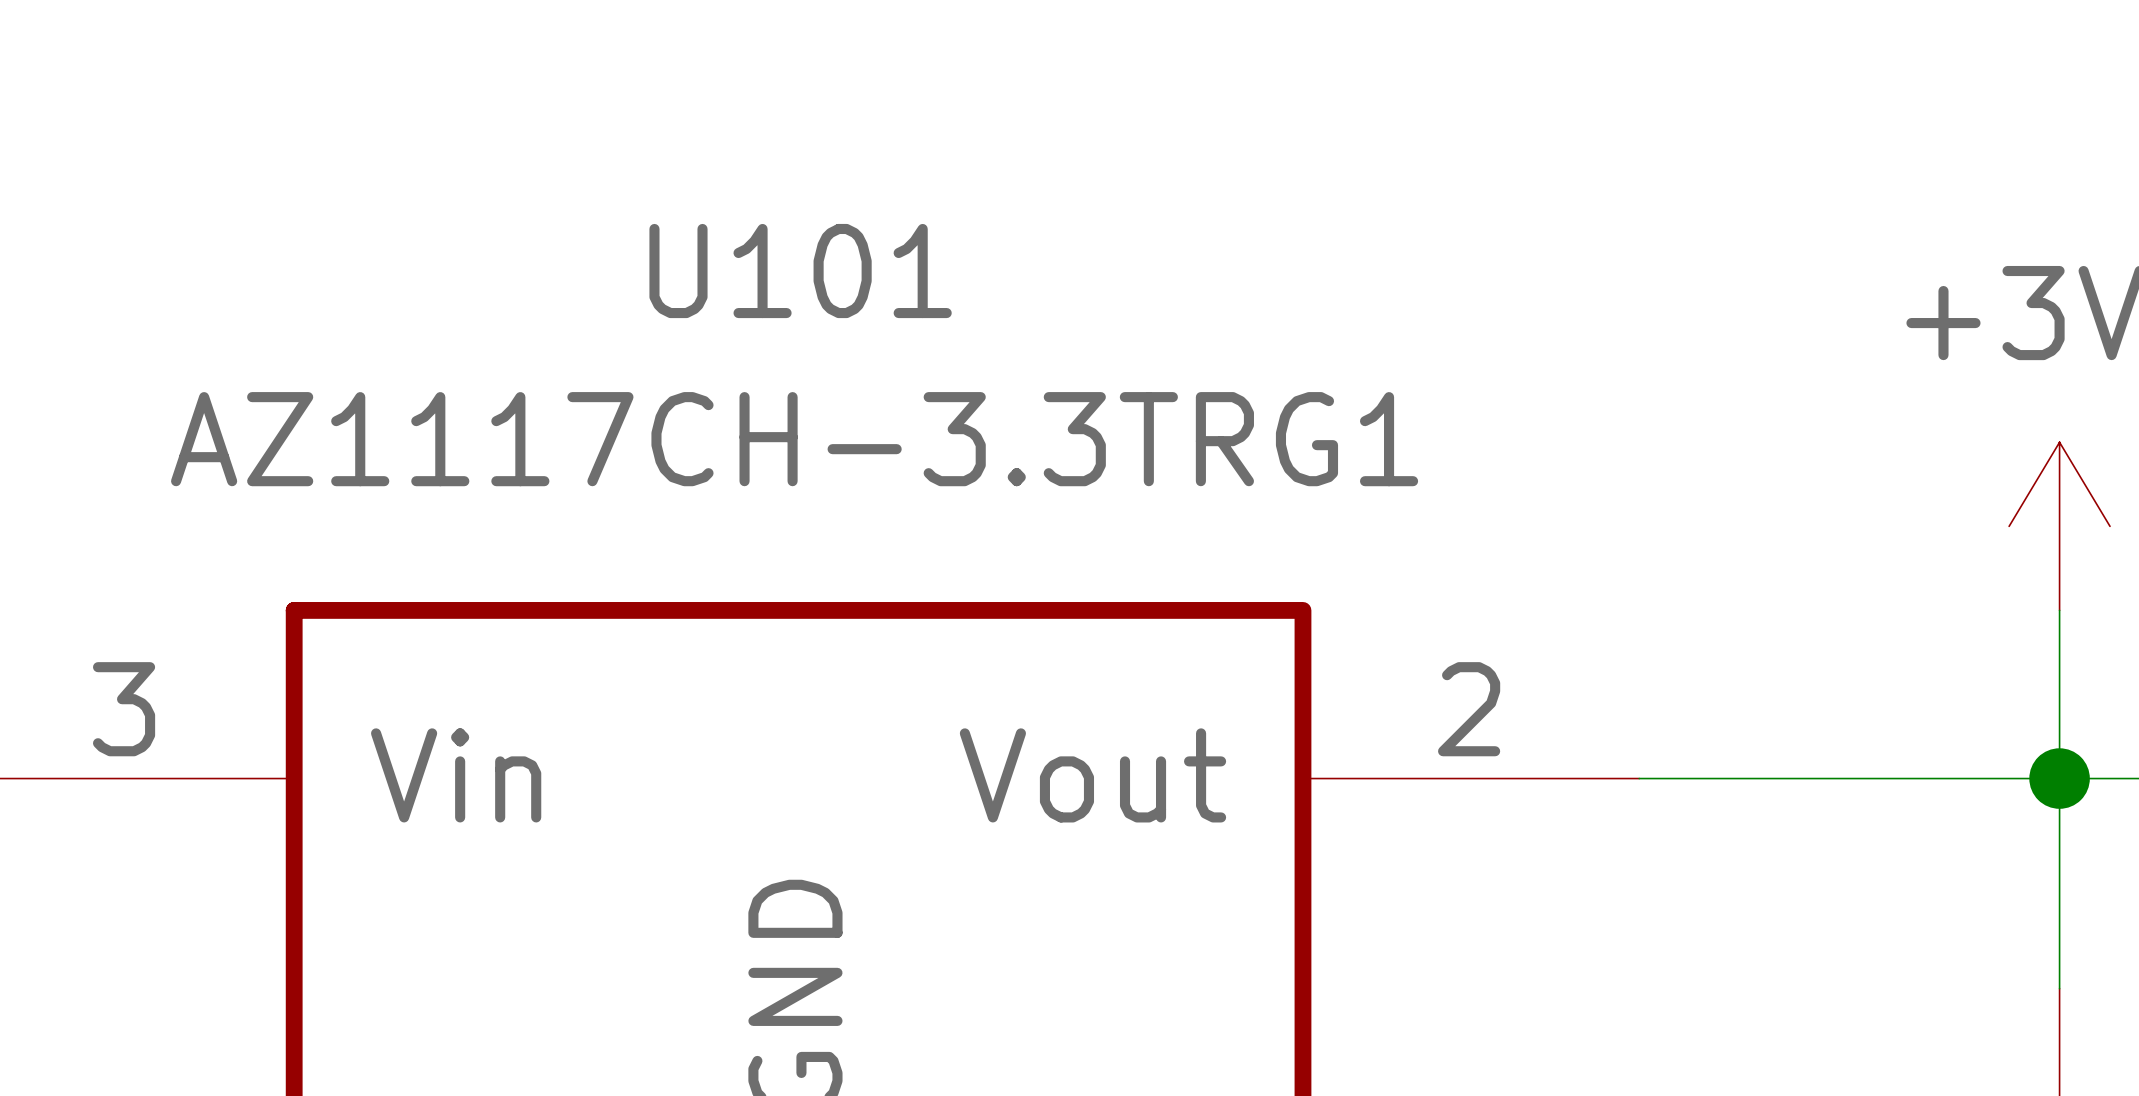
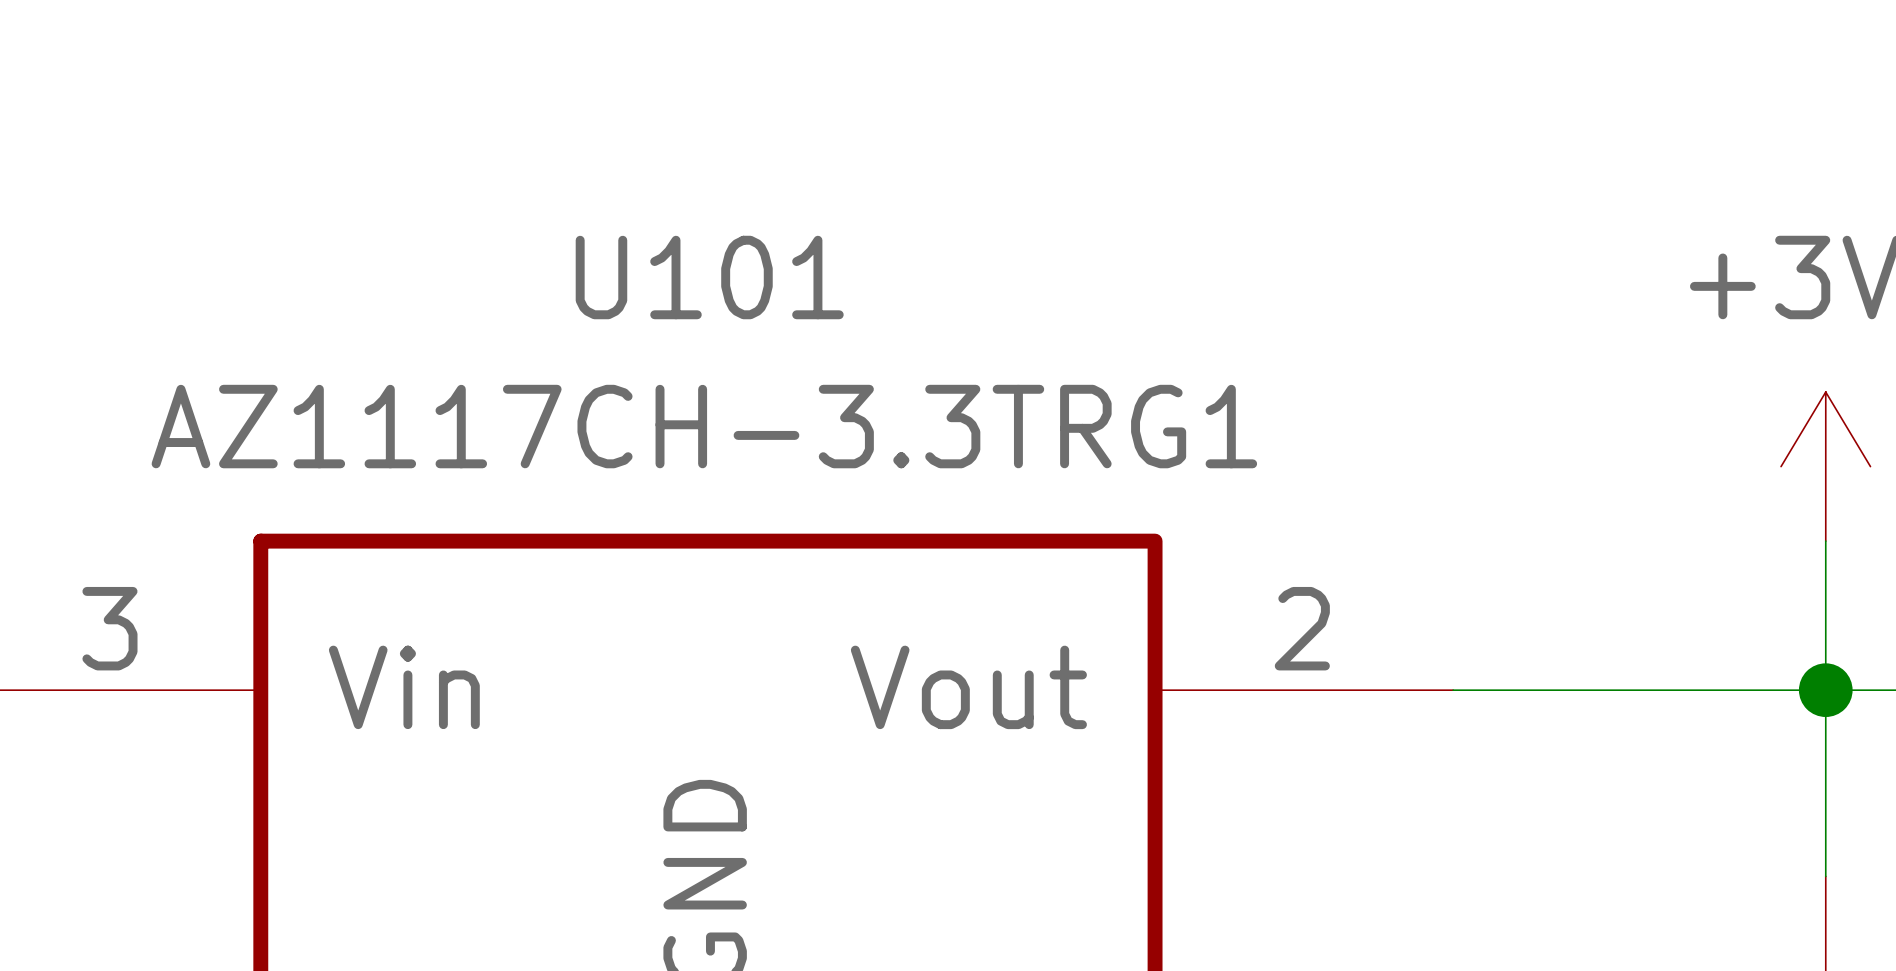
U101 name position: U101 (800, 271) -> U101 (709, 277)
U101 value position: AZ1117CH-3.3TRG1 (794, 439) -> AZ1117CH-3.3TRG1 (704, 426)

